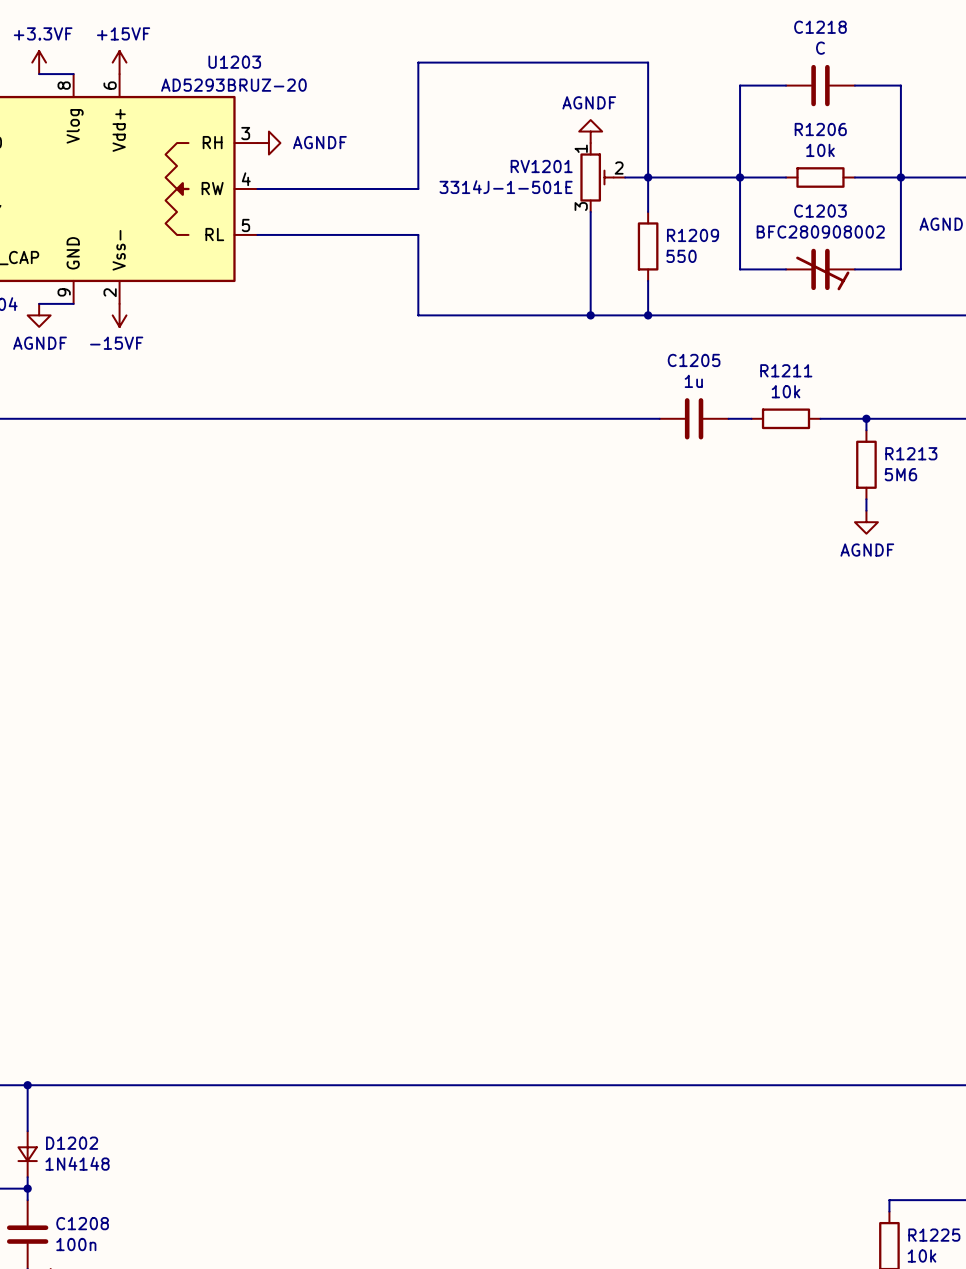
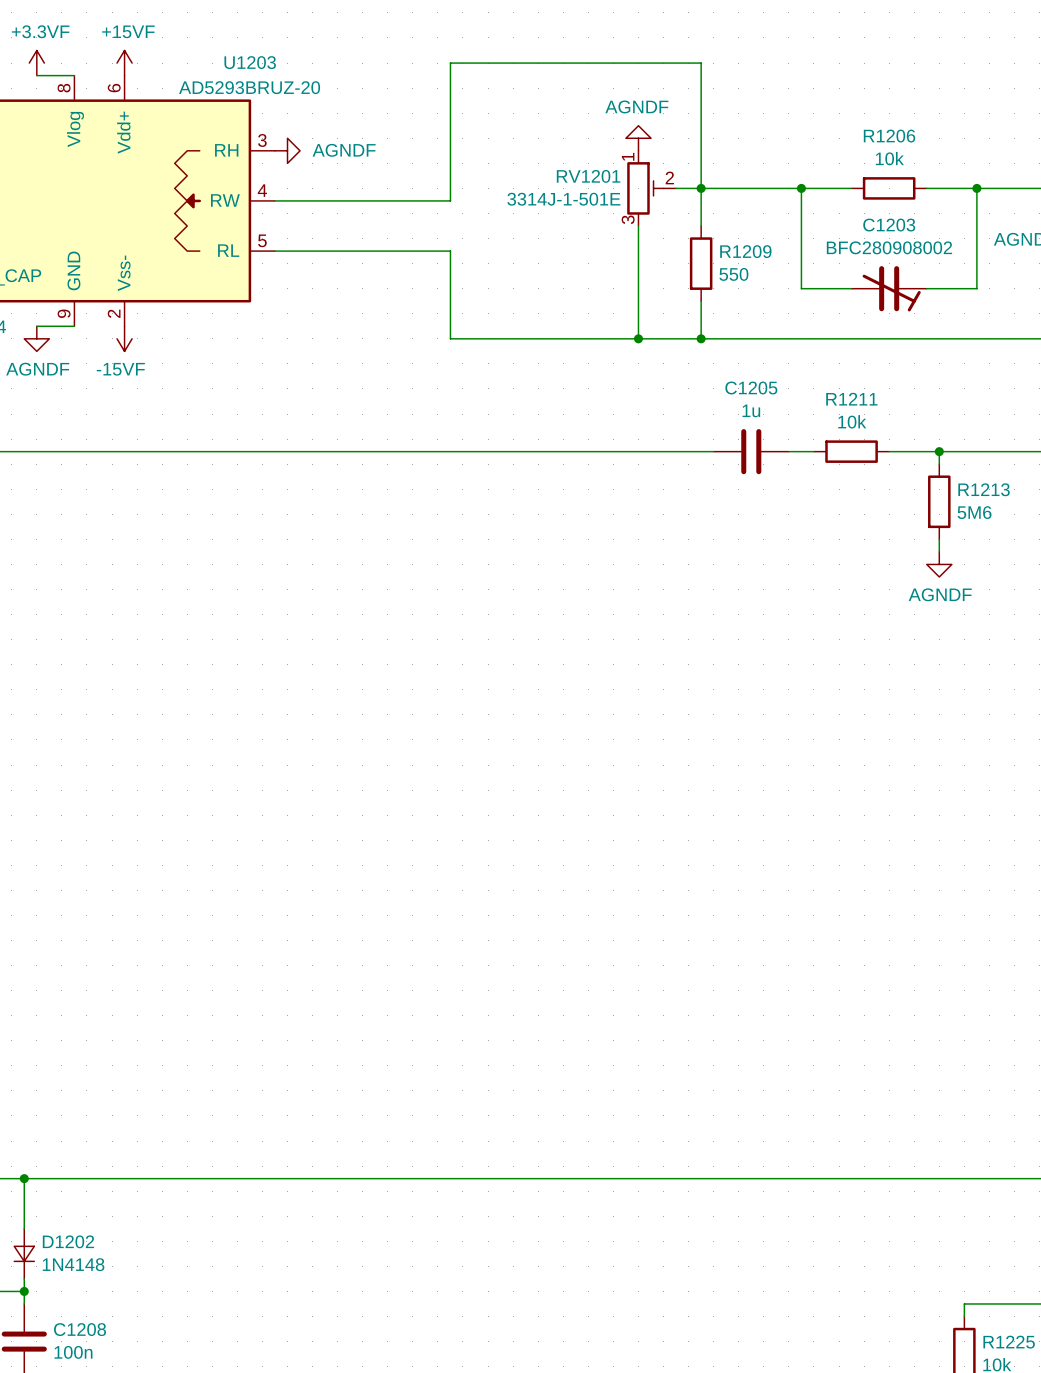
wire: (786, 85) (740, 85) (740, 177) -> none
C1218: C (820, 85) -> none
wire: (854, 85) (900, 85) (900, 177) -> none

